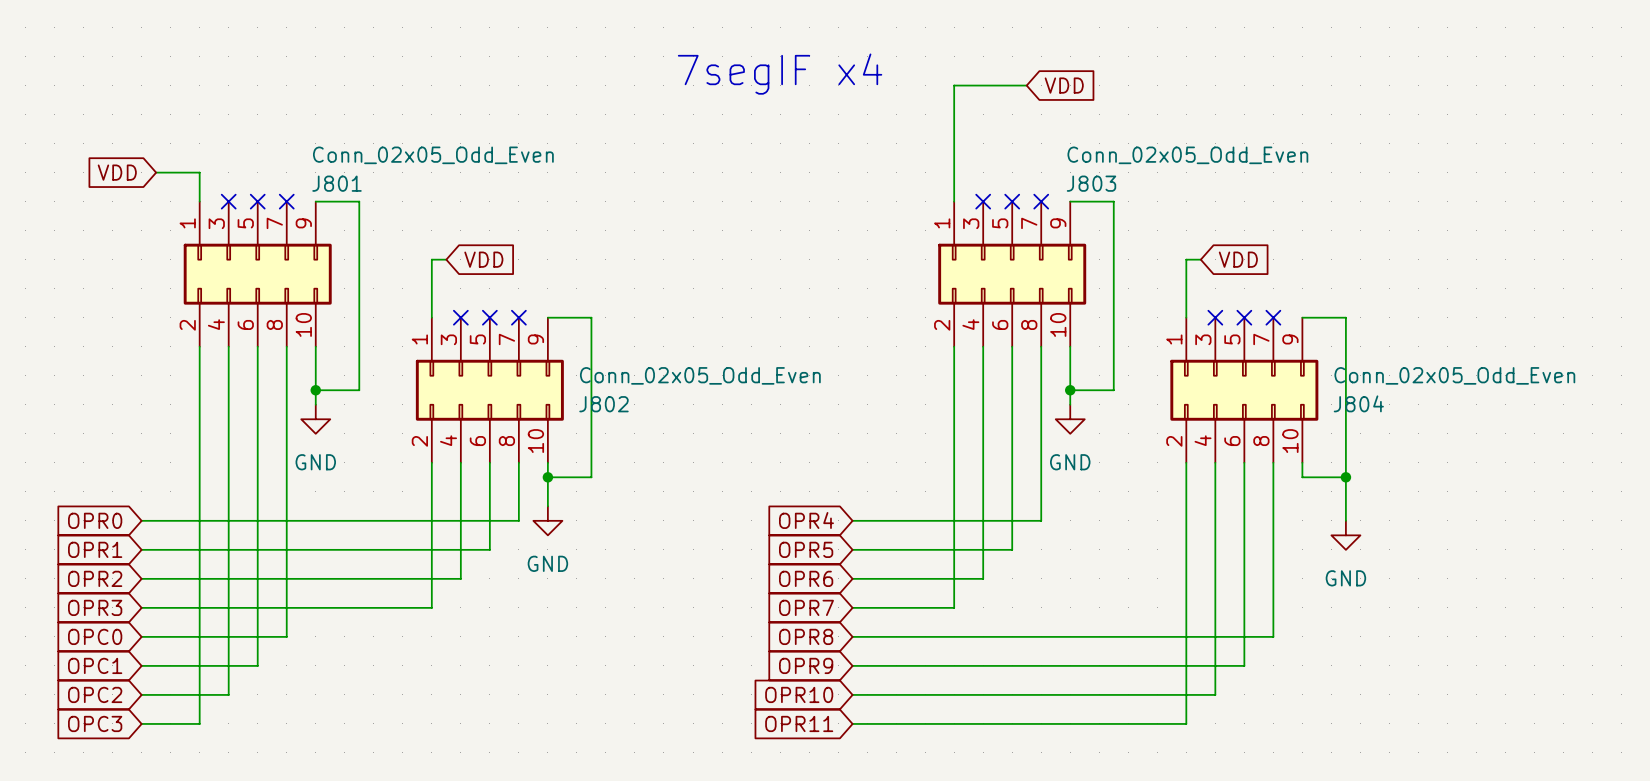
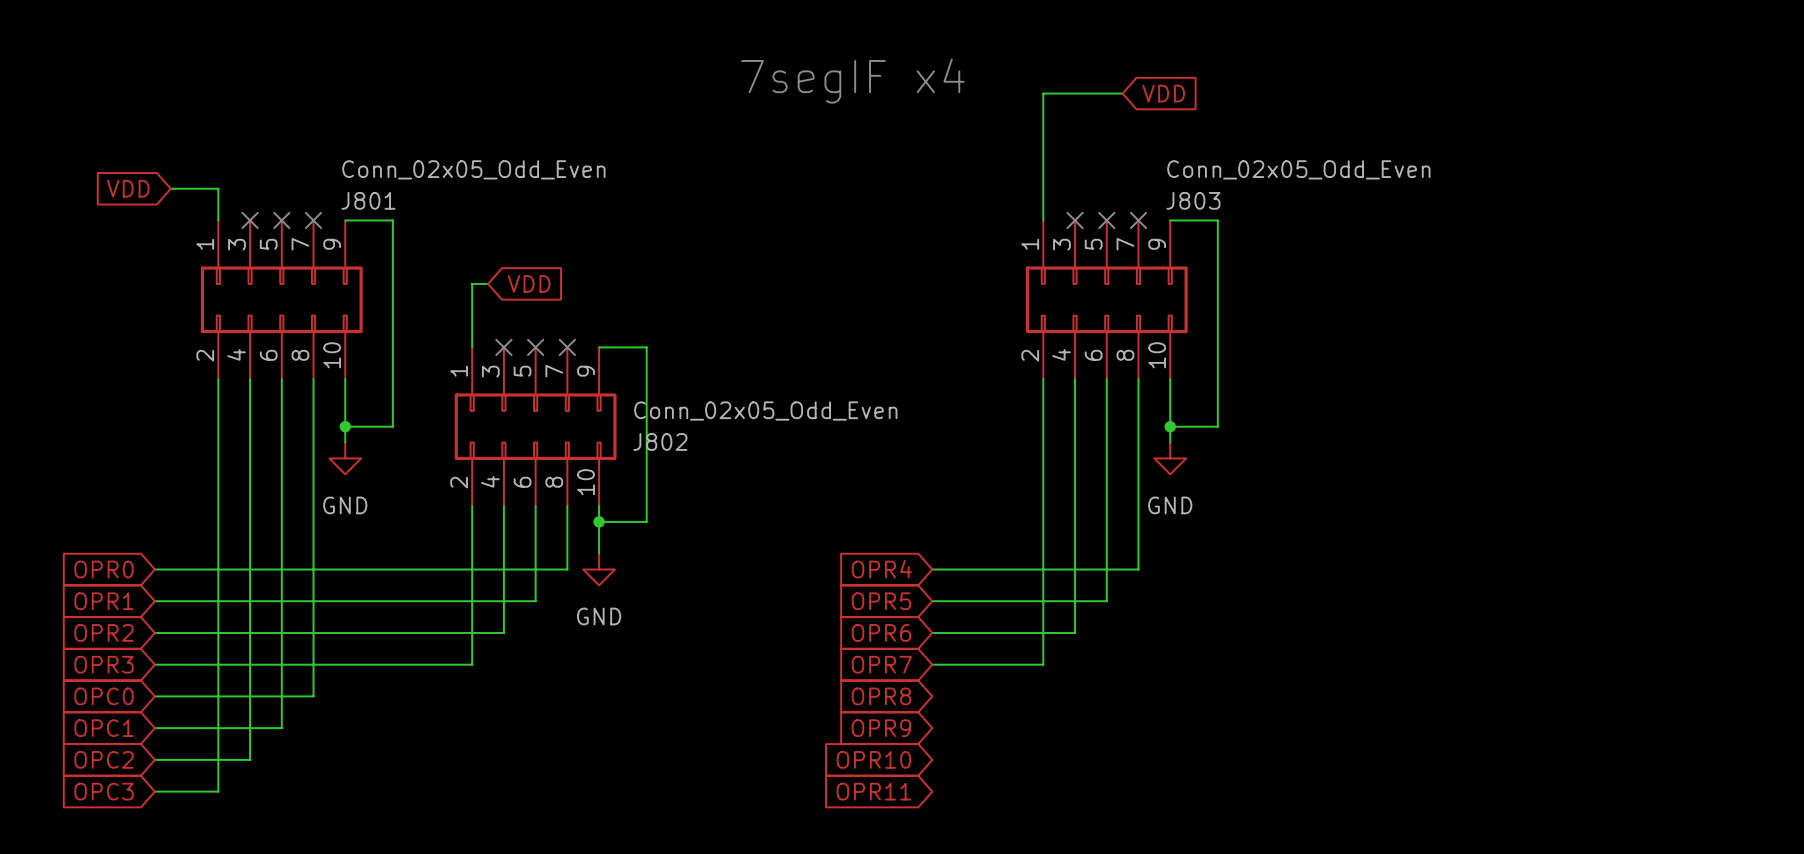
wire: (1200, 259) (1186, 259) (1186, 317) -> none
global label: VDD (1238, 259) -> none
no-connect mark: (1215, 317) -> none
no-connect mark: (1244, 317) -> none
no-connect mark: (1273, 317) -> none
wire: (1302, 317) (1345, 317) (1345, 520) -> none
J804: Conn_02x05_Odd_Even (1244, 390) -> none
wire: (1186, 462) (1186, 723) (852, 723) -> none
wire: (1215, 462) (1215, 694) (852, 694) -> none
wire: (1244, 462) (1244, 665) (852, 665) -> none
wire: (1273, 462) (1273, 636) (852, 636) -> none
wire: (1302, 462) (1302, 477) (1345, 477) -> none
junction: (1345, 477) -> none
power symbol: GND (1345, 535) -> none

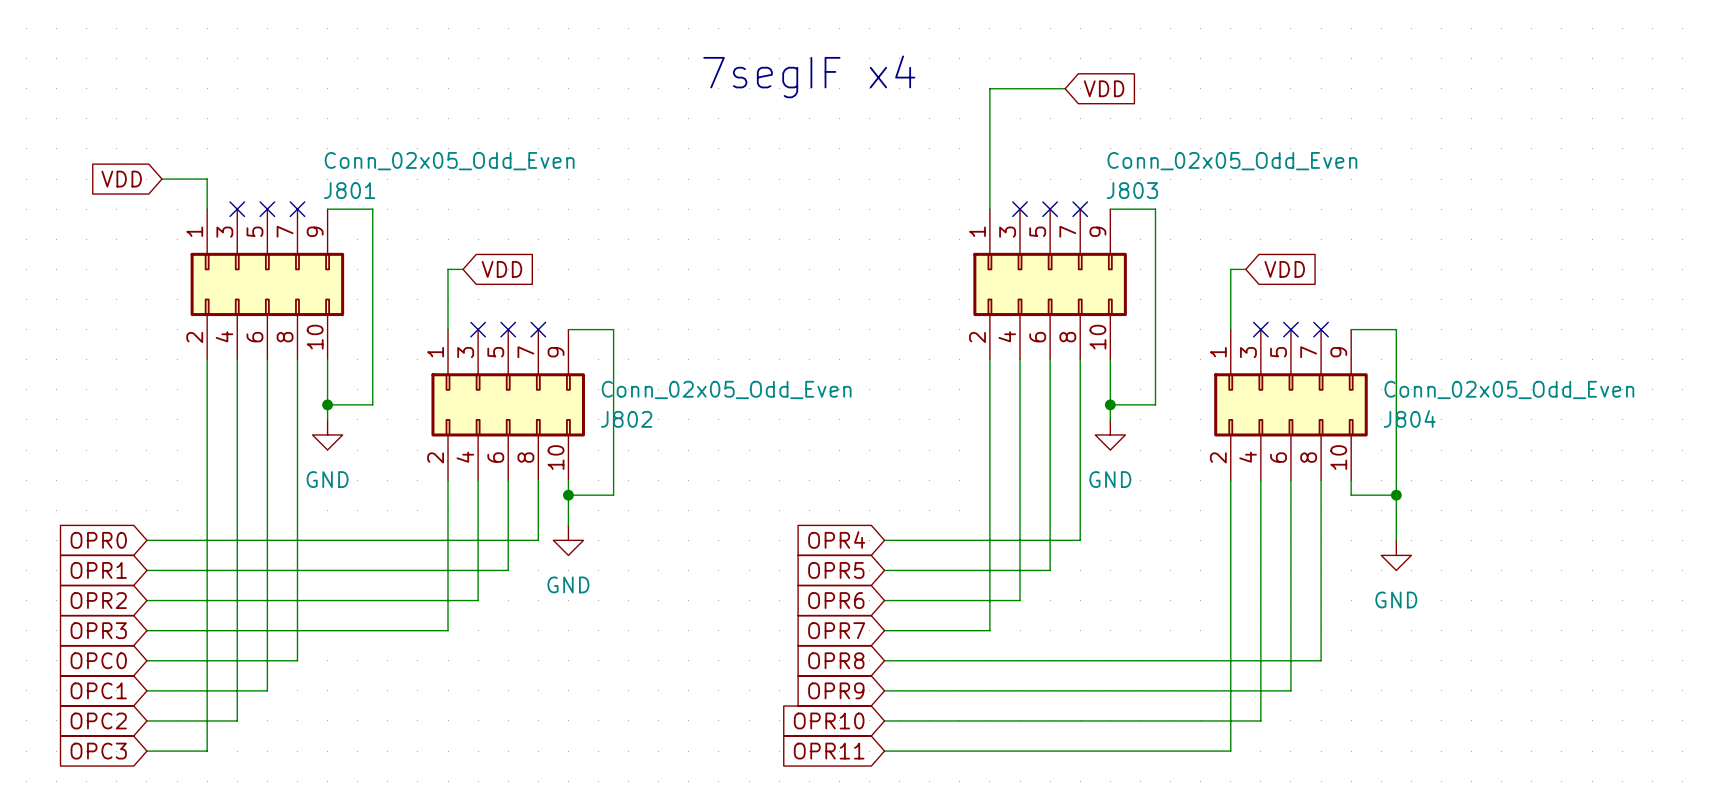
wire: none -> (1245, 269) (1230, 269) (1230, 329)
global label: none -> VDD (1284, 269)
no-connect mark: none -> (1260, 329)
no-connect mark: none -> (1290, 329)
no-connect mark: none -> (1321, 329)
wire: none -> (1351, 329) (1396, 329) (1396, 540)
J804: none -> Conn_02x05_Odd_Even (1290, 404)
wire: none -> (1230, 480) (1230, 751) (884, 751)
wire: none -> (1260, 480) (1260, 720) (884, 720)
wire: none -> (1290, 480) (1290, 690) (884, 690)
wire: none -> (1321, 480) (1321, 660) (884, 660)
wire: none -> (1351, 480) (1351, 495) (1396, 495)
junction: none -> (1396, 495)
power symbol: none -> GND (1396, 555)

